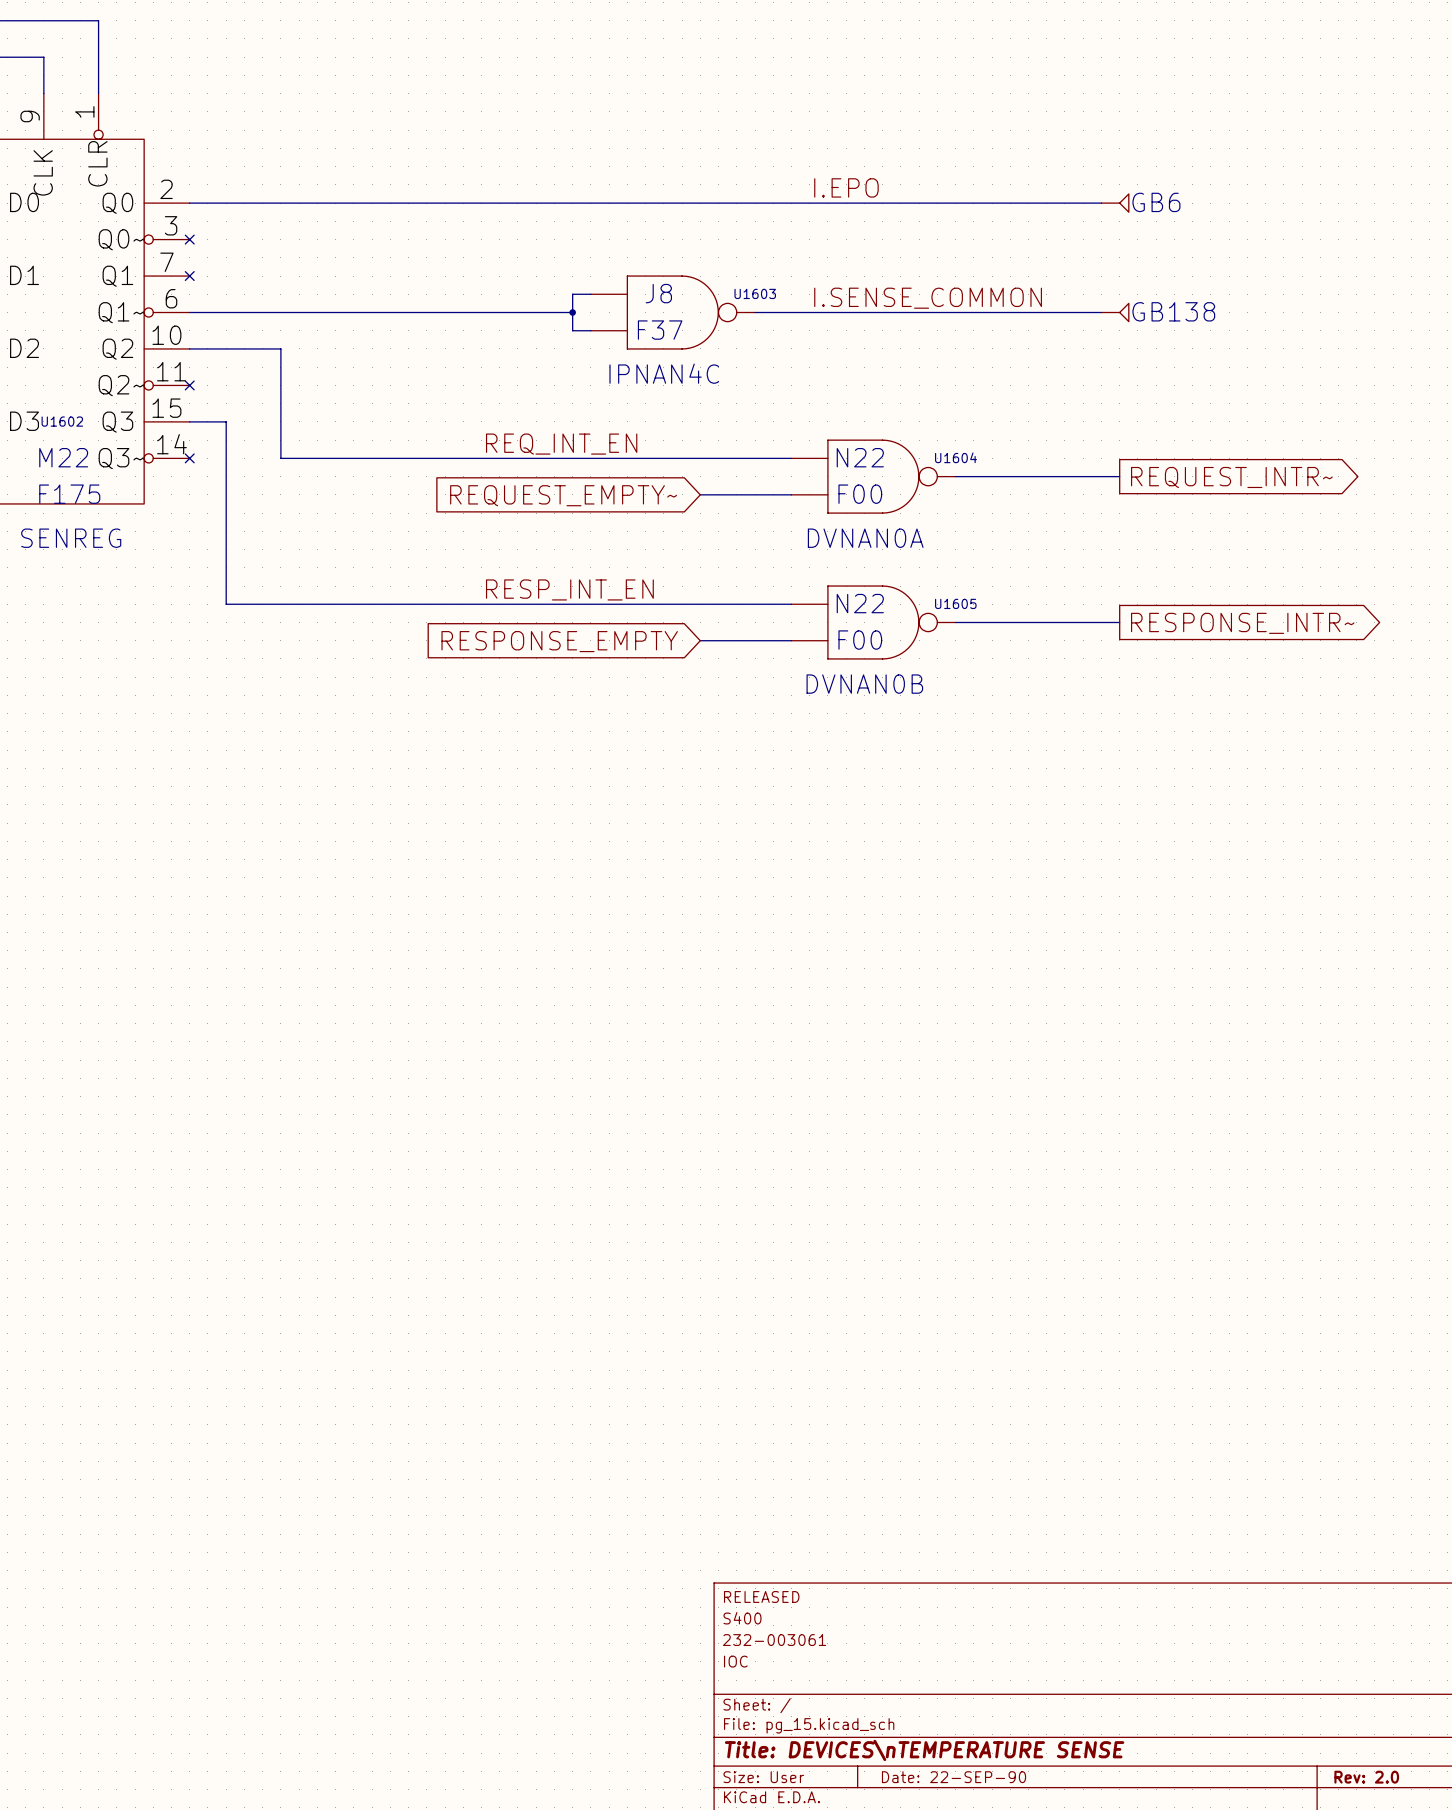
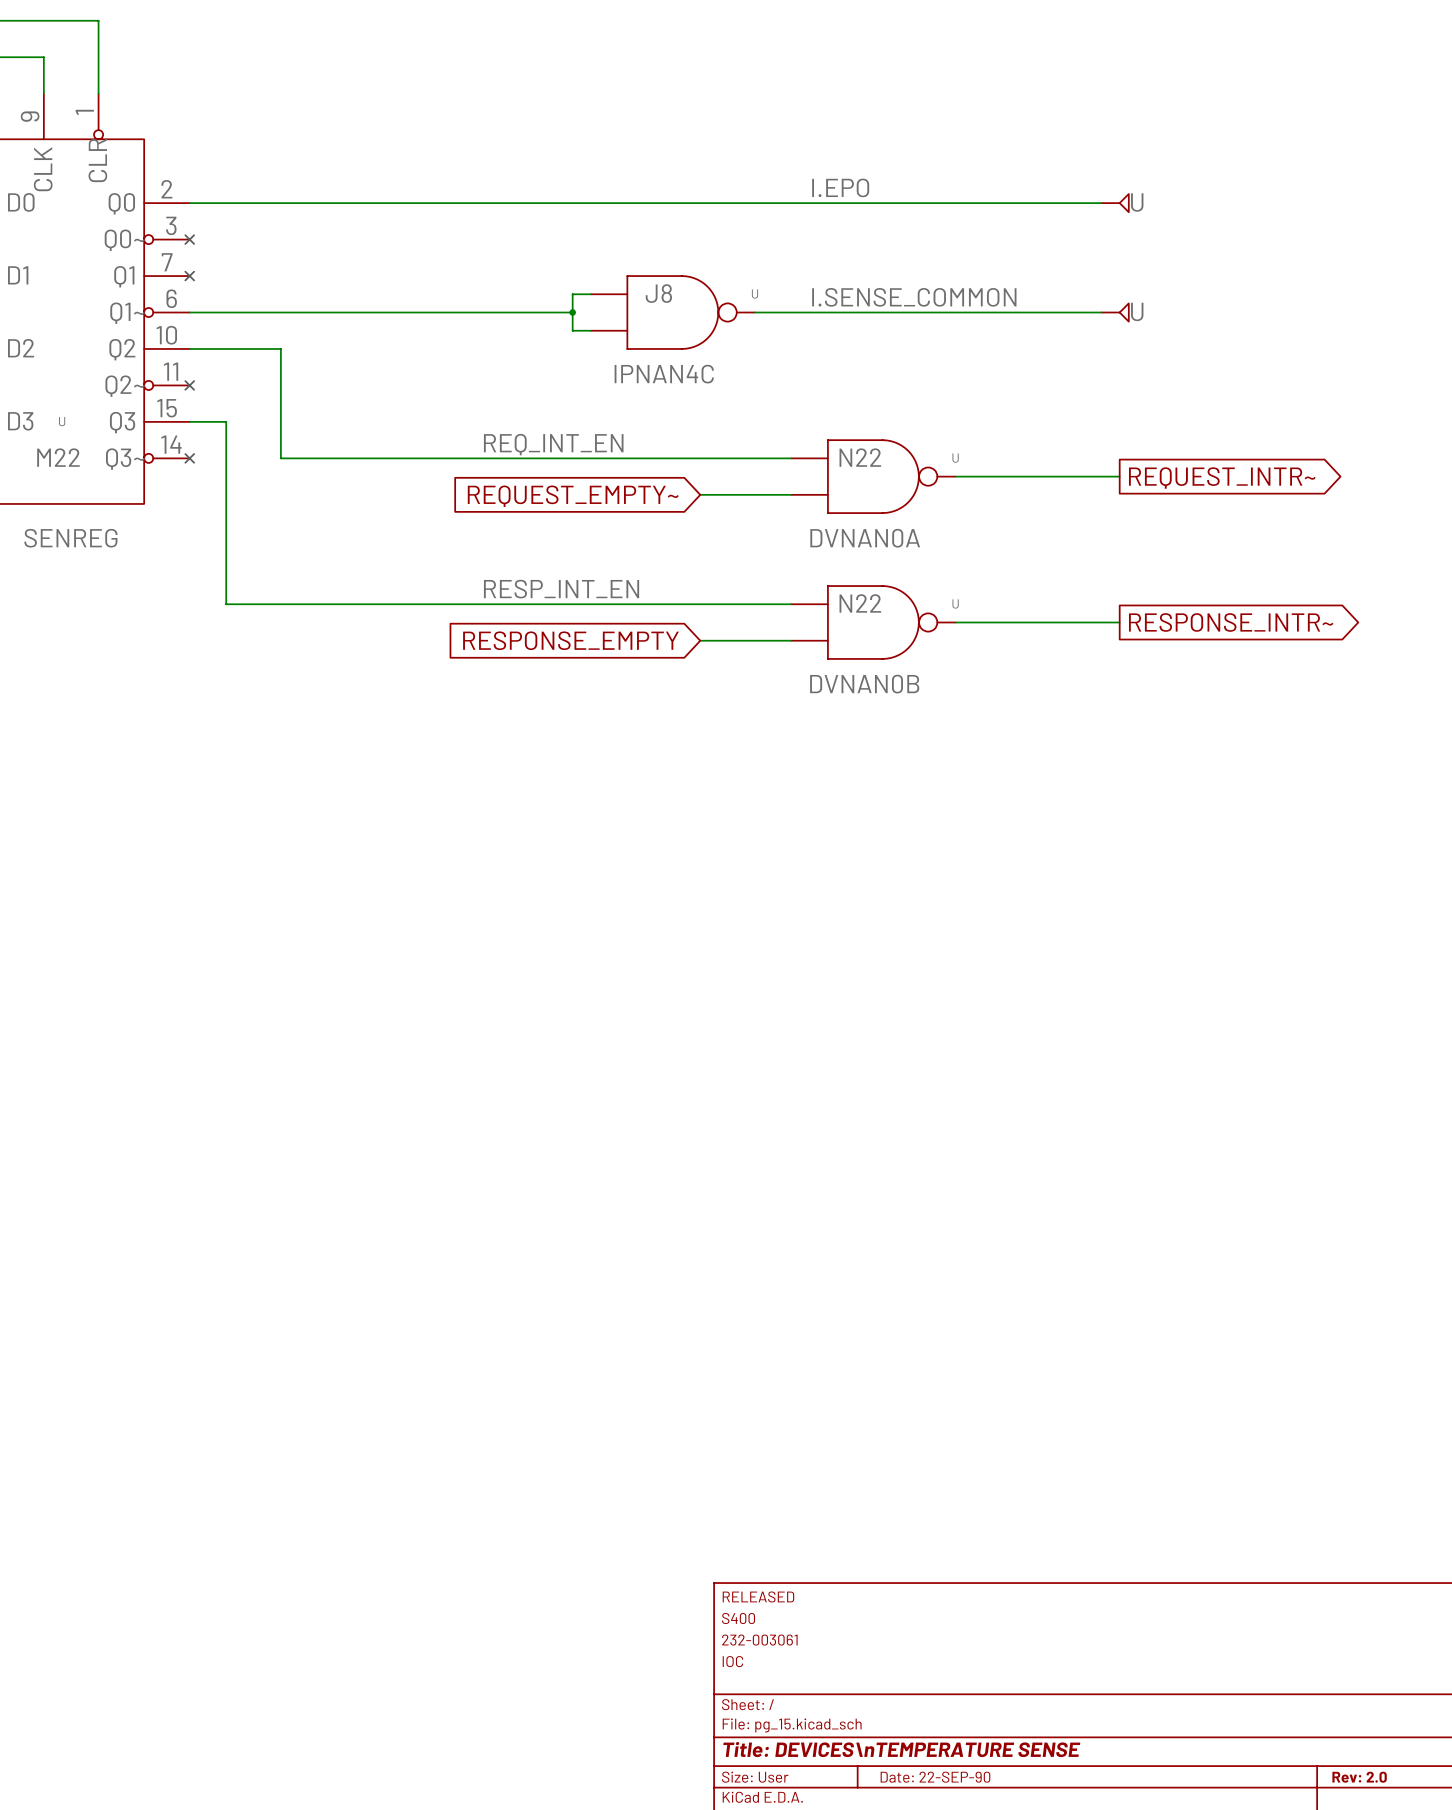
GB6 name: GB6 (1156, 202) -> U (1137, 202)
U1603 name: U1603 (755, 293) -> U (755, 293)
GB138 name: GB138 (1173, 311) -> U (1137, 311)
U1603 value: F37 (660, 330) -> none
U1602 name: U1602 (62, 421) -> U (62, 421)
U1604 name: U1604 (956, 457) -> U (955, 458)
U1602 value: F175 (69, 494) -> none
U1604 value: F00 (860, 494) -> none
U1605 name: U1605 (955, 603) -> U (955, 603)
U1605 value: F00 (860, 640) -> none

